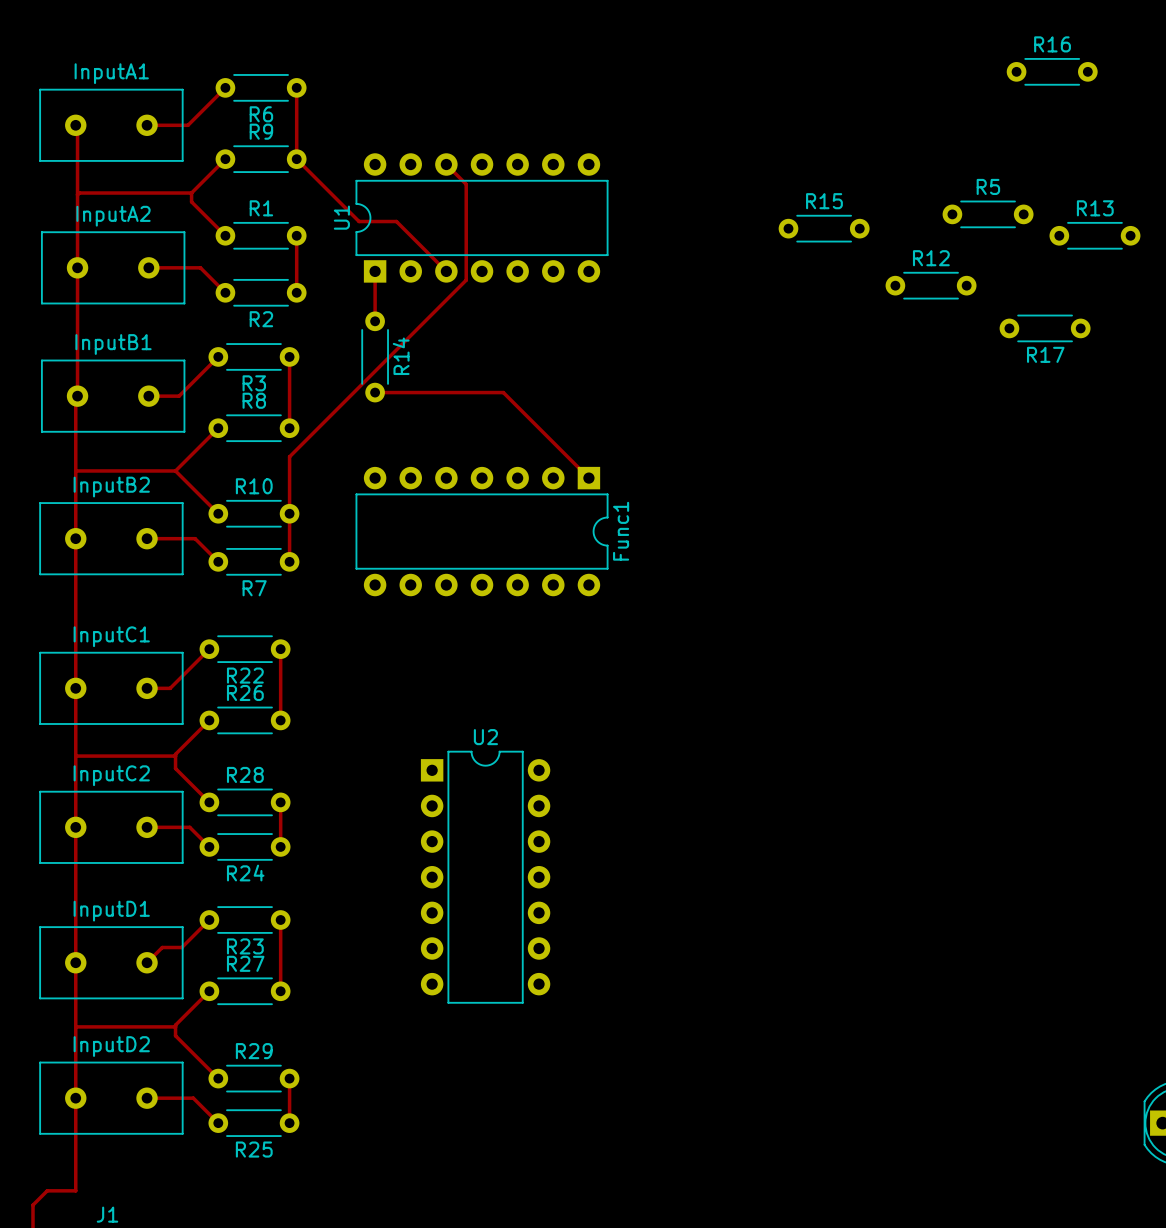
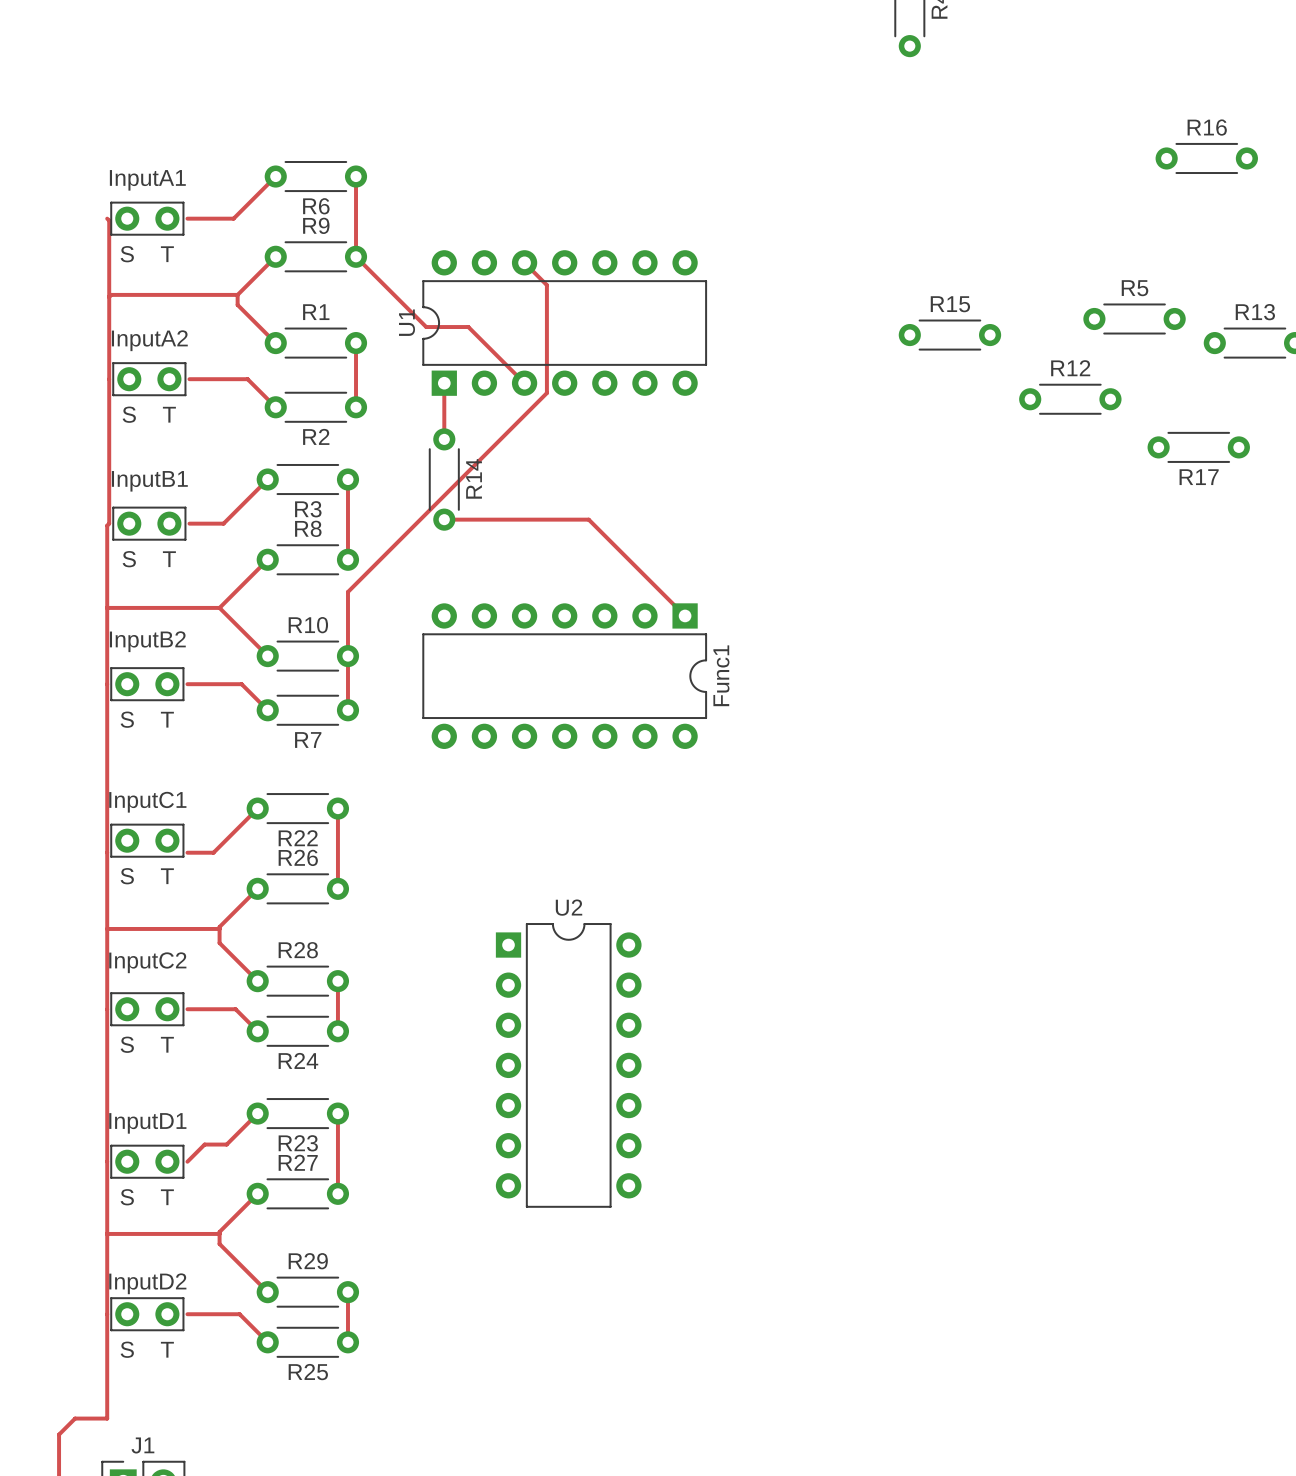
InputA1 footprint: [39, 88, 184, 162] -> [110, 201, 185, 236]
InputA2 footprint: [41, 231, 186, 305] -> [112, 362, 187, 397]
InputB1 footprint: [41, 359, 186, 433] -> [112, 506, 187, 541]
InputB2 footprint: [39, 502, 184, 576] -> [110, 667, 185, 702]
InputC1 footprint: [39, 651, 184, 725] -> [110, 823, 185, 858]
InputC2 footprint: [39, 790, 184, 864] -> [110, 992, 185, 1027]
InputD1 footprint: [39, 926, 184, 1000] -> [110, 1144, 185, 1179]
InputD2 footprint: [39, 1061, 184, 1135] -> [110, 1297, 185, 1332]

